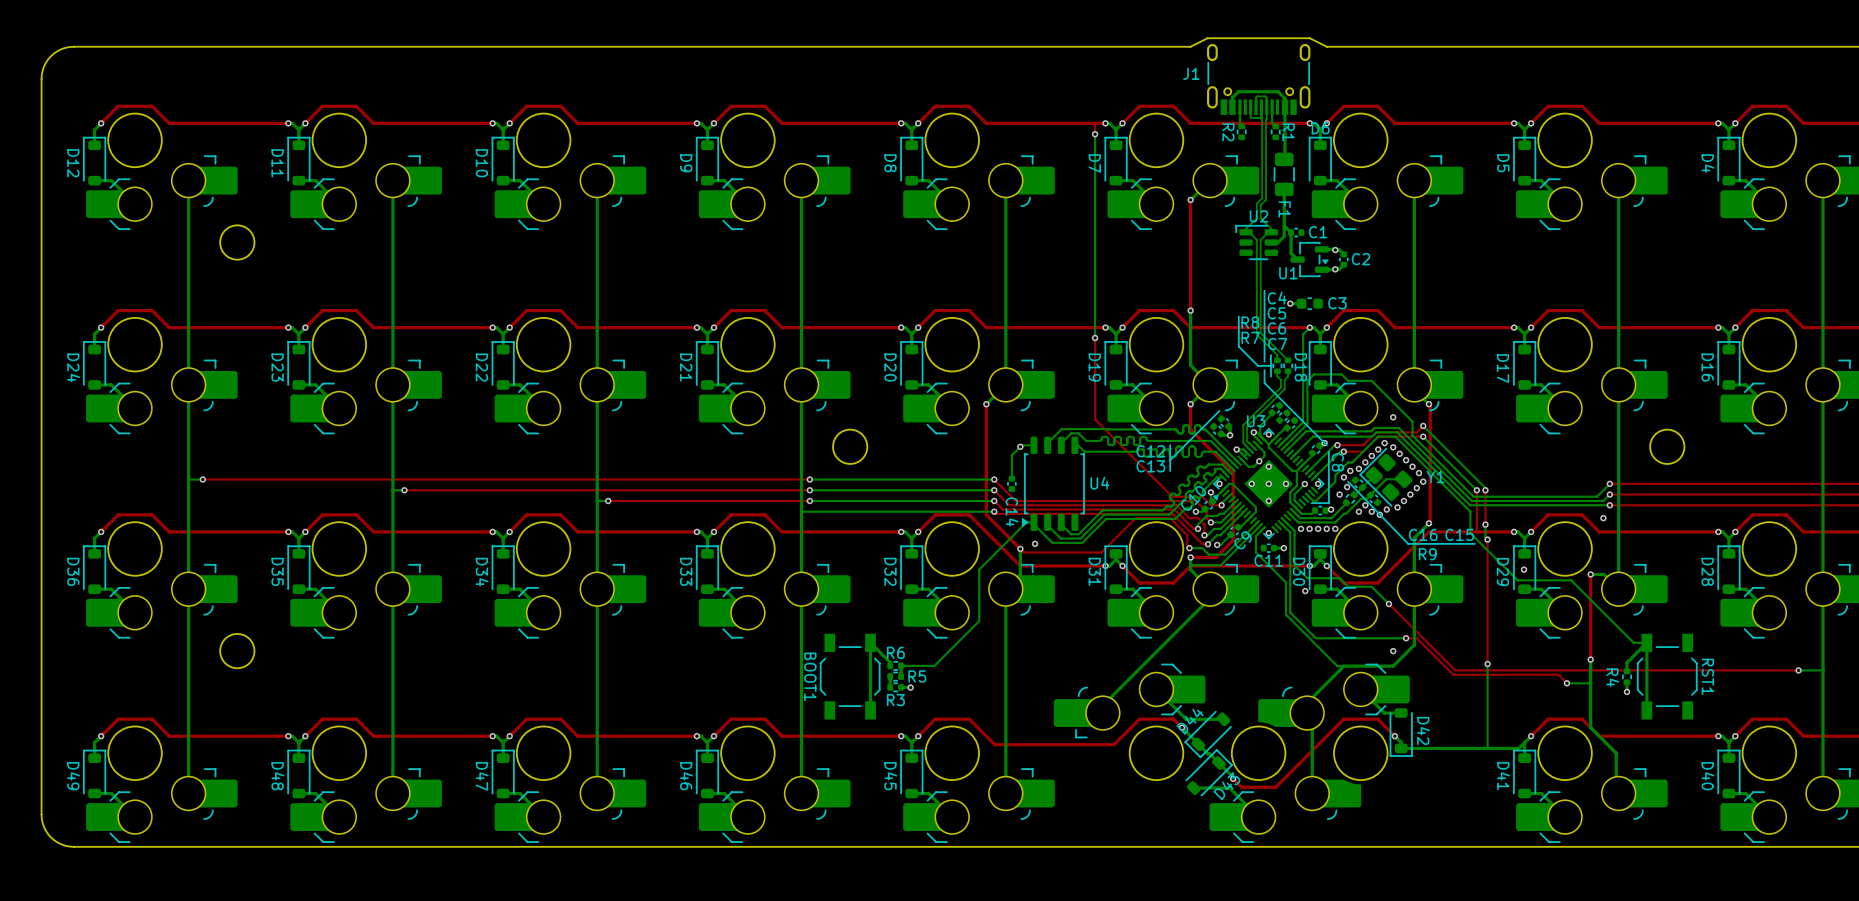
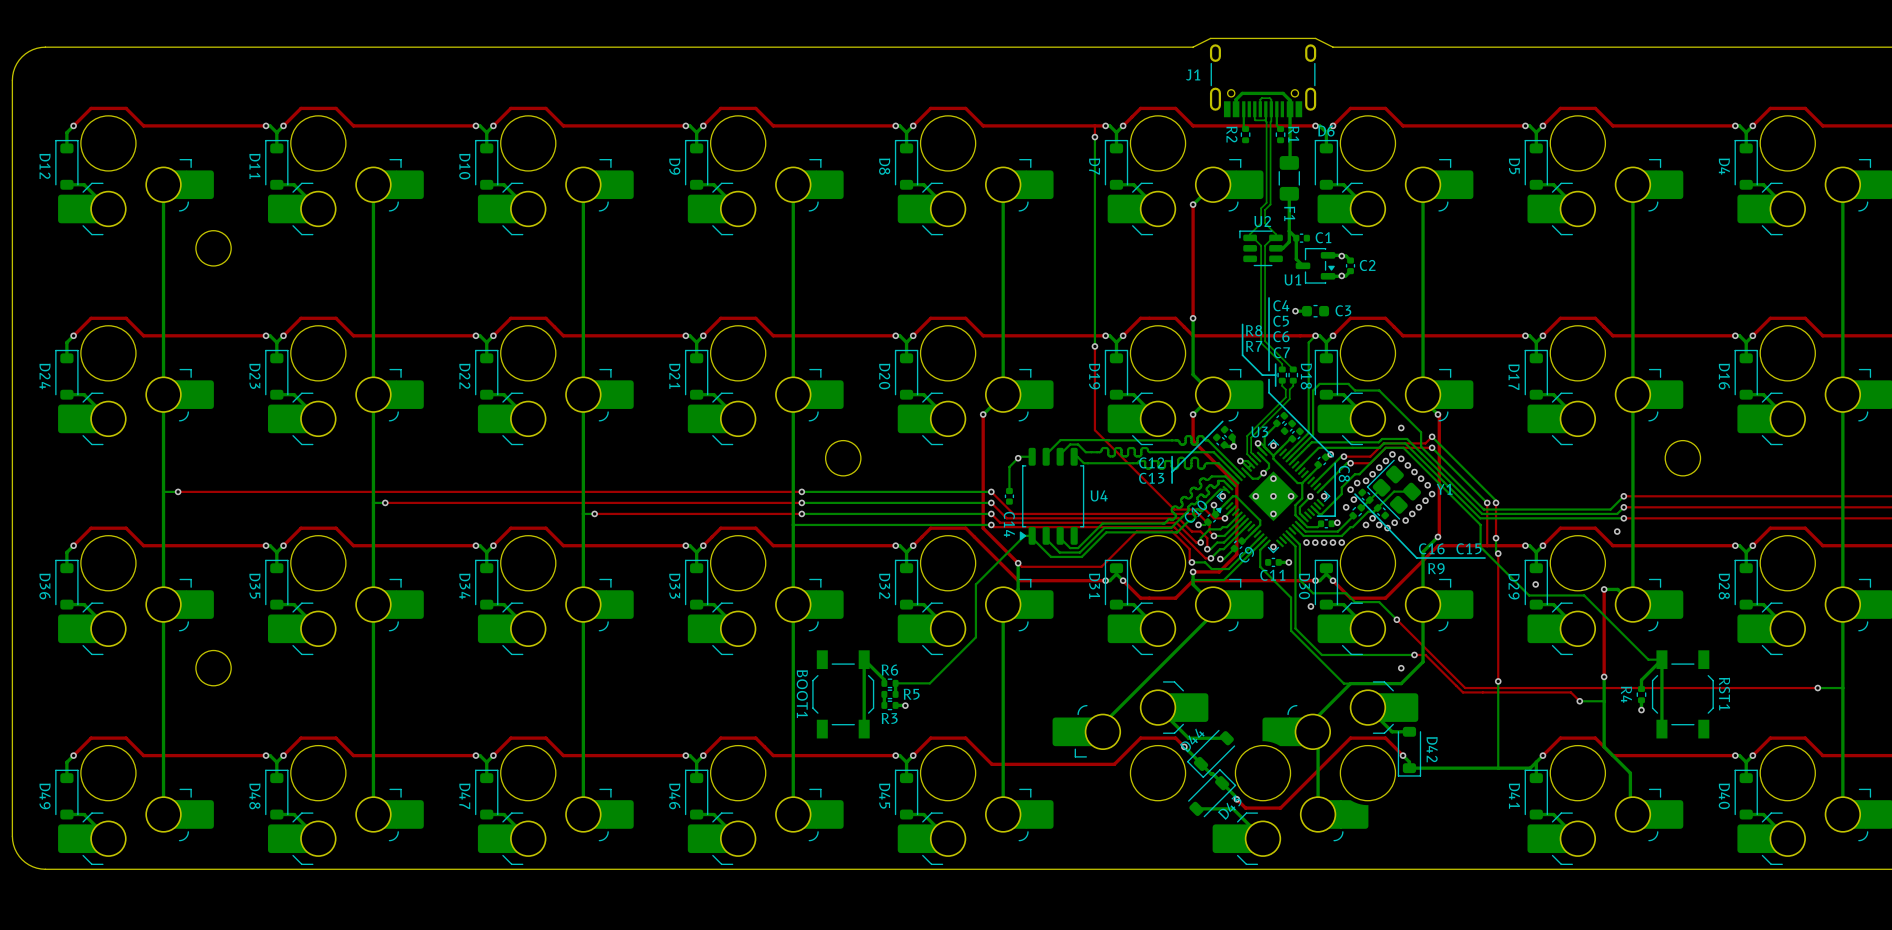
via: (1035, 543) -> none

